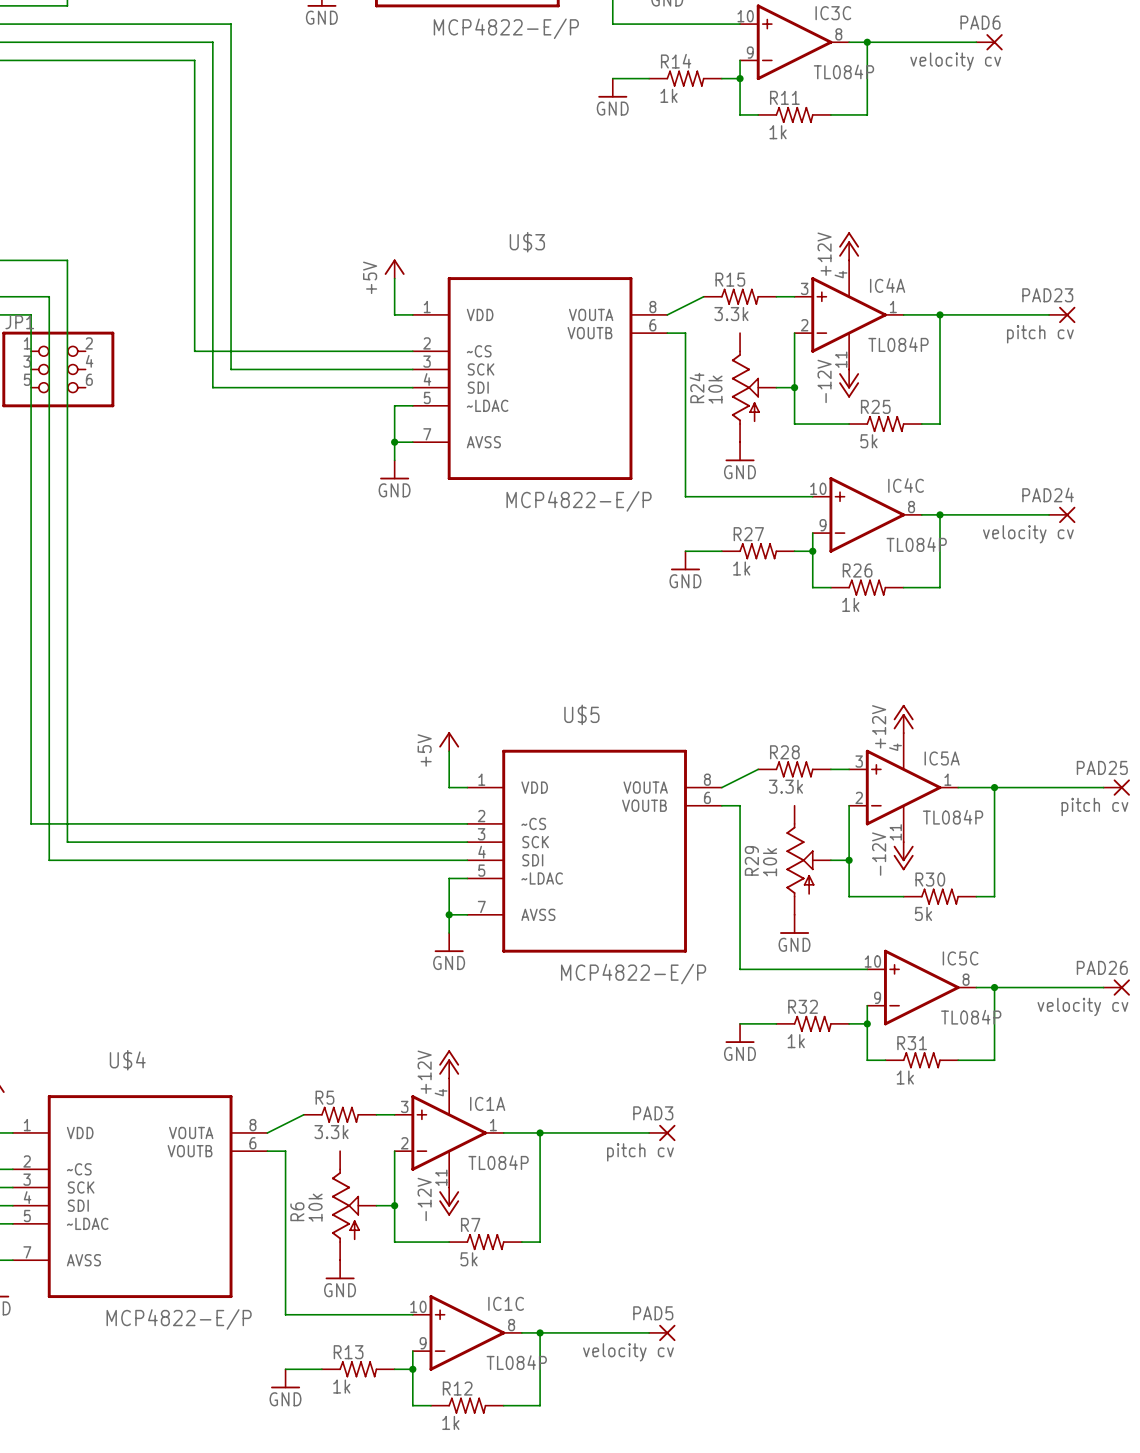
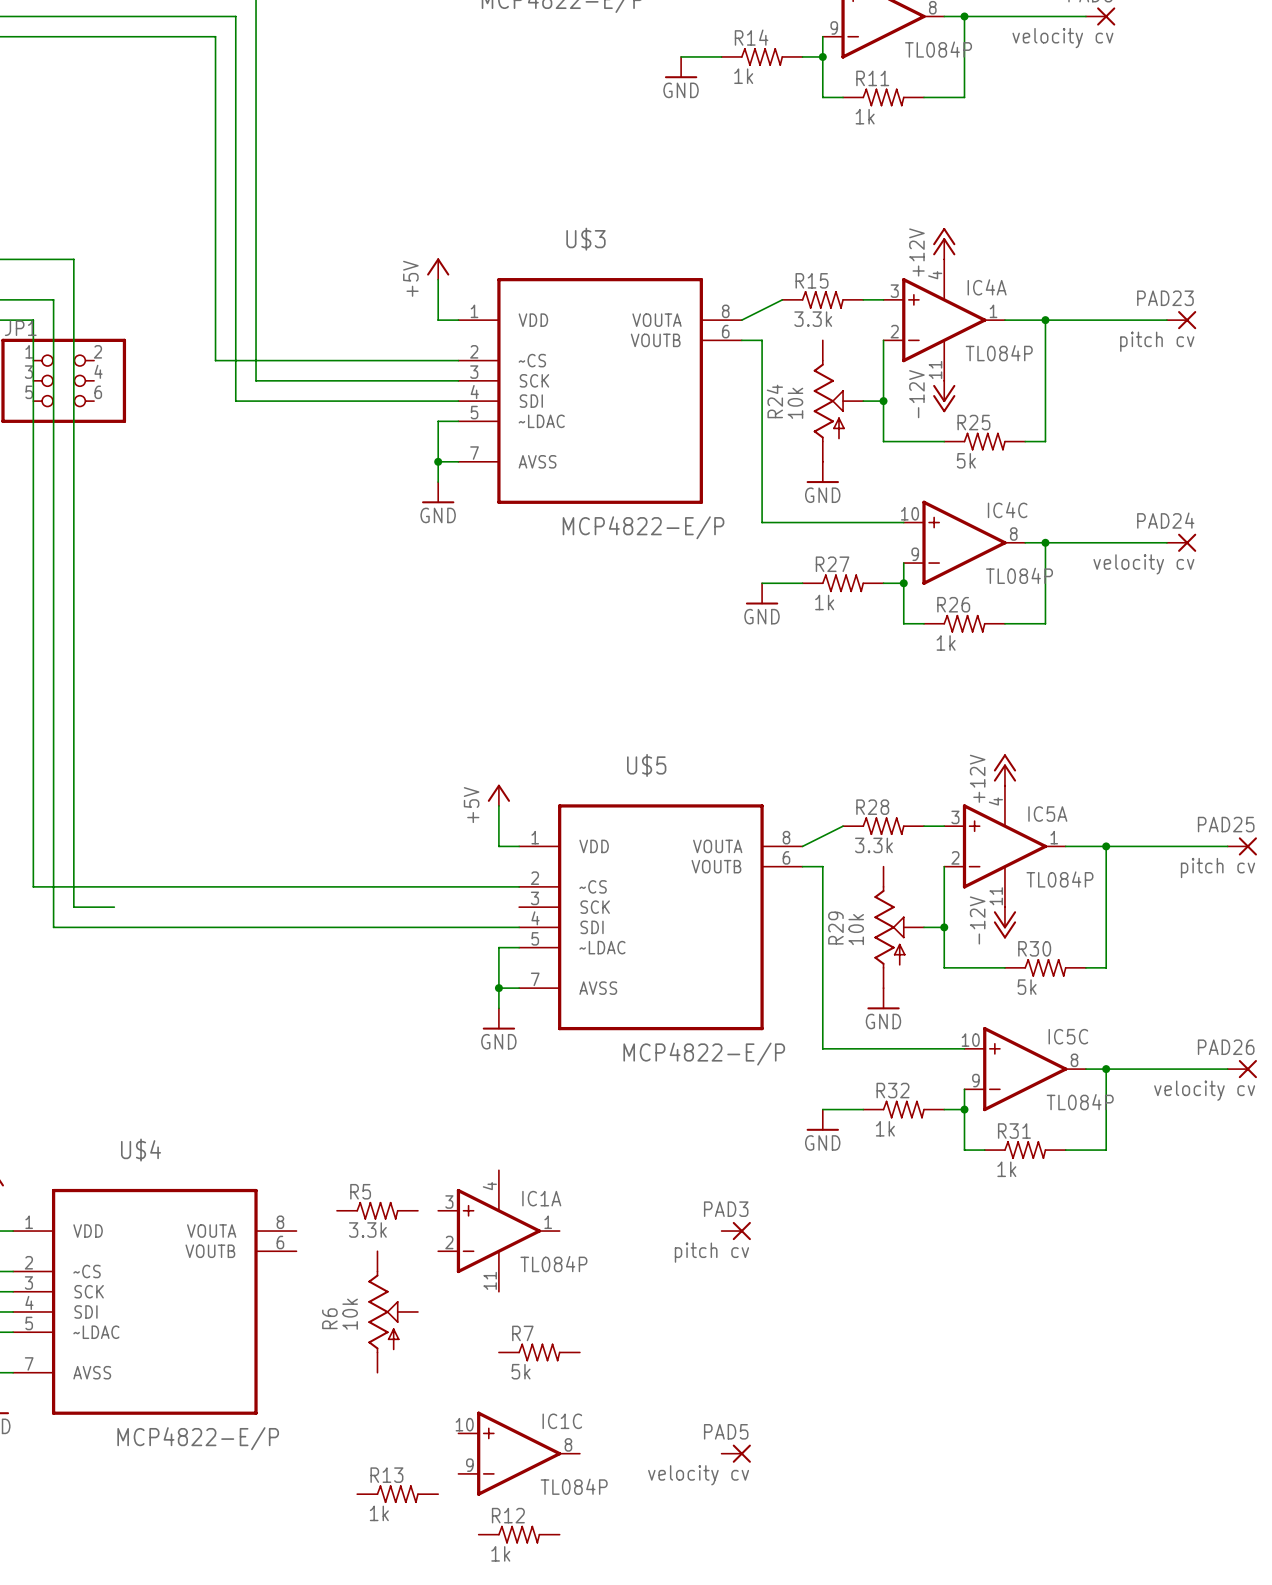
wire: (103, 842) (467, 842) -> none
power symbol: +12V (449, 1064) -> none
wire: (303, 1114) (267, 1132) -> none
wire: (376, 1114) (394, 1114) -> none
wire: (503, 1132) (649, 1132) -> none
wire: (540, 1132) (540, 1242) (521, 1242) -> none
junction: (540, 1132) -> none
wire: (267, 1151) (285, 1151) (285, 1314) (412, 1314) -> none
wire: (394, 1151) (394, 1242) (449, 1242) -> none
power symbol: -12V (449, 1201) -> none
wire: (376, 1205) (394, 1205) -> none
junction: (394, 1205) -> none
power symbol: GND (340, 1269) -> none
wire: (521, 1332) (649, 1332) -> none
wire: (540, 1332) (540, 1405) (503, 1405) -> none
junction: (540, 1332) -> none
wire: (412, 1351) (412, 1405) (431, 1405) -> none
wire: (285, 1369) (321, 1369) -> none
wire: (394, 1369) (412, 1369) -> none
junction: (412, 1369) -> none
power symbol: GND (285, 1378) -> none

